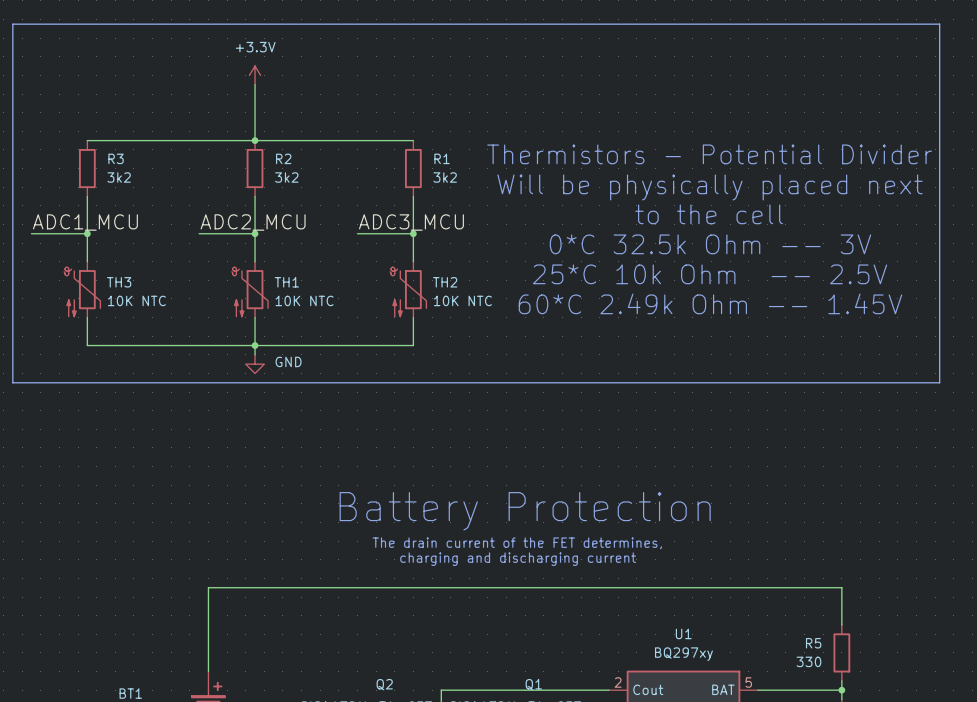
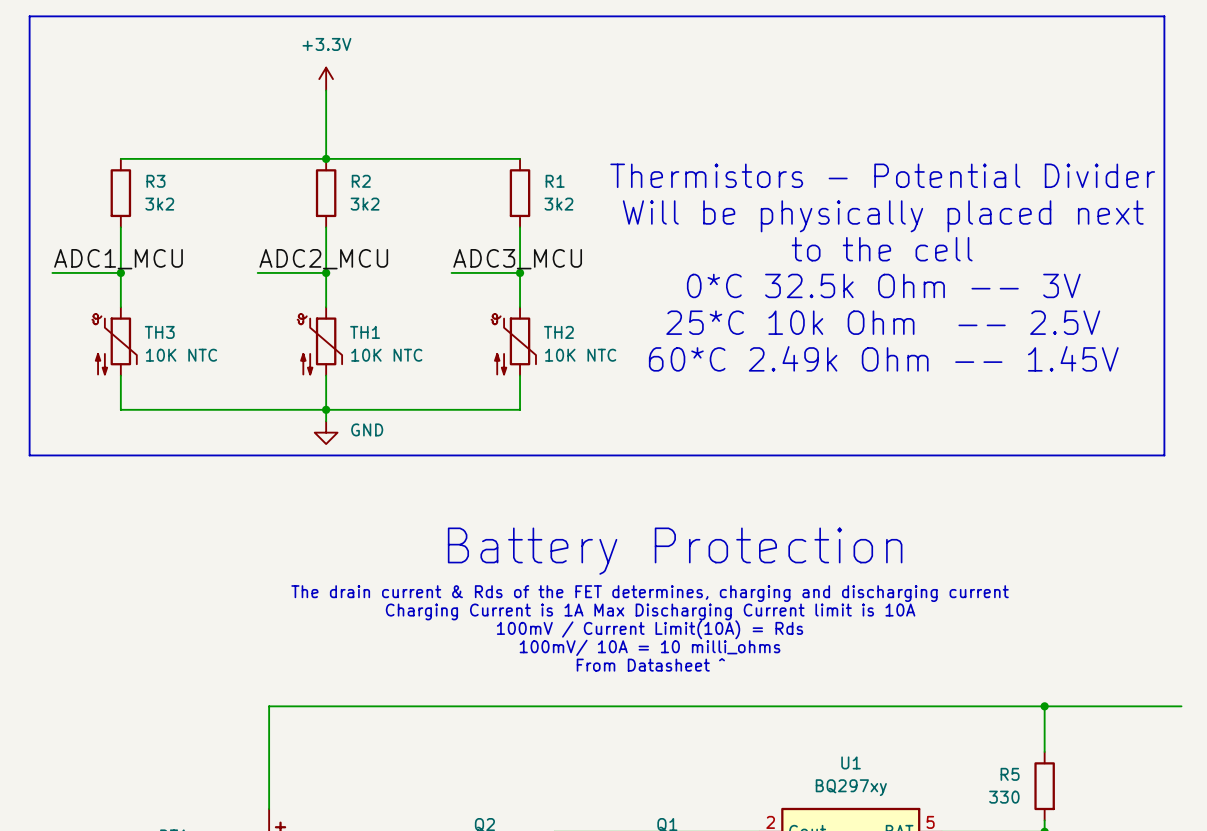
text: none -> The drain current & Rds of the FET determines, charging and discharging current (650, 593)
text: none -> Charging Current is 1A Max Discharging Current limit is 10A (650, 611)
text position: Battery Protection (525, 511) -> Battery Protection (675, 551)
text: none -> 100mV / Current Limit(10A) = Rds (650, 629)
text: The drain current of the FET determines, (517, 543) -> 100mV/ 10A = 10 milli_ohms (650, 647)
text: charging and discharging current (518, 559) -> From Datasheet ^ (650, 664)
wire: none -> (1044, 706) (1181, 706)
junction: none -> (1044, 706)

